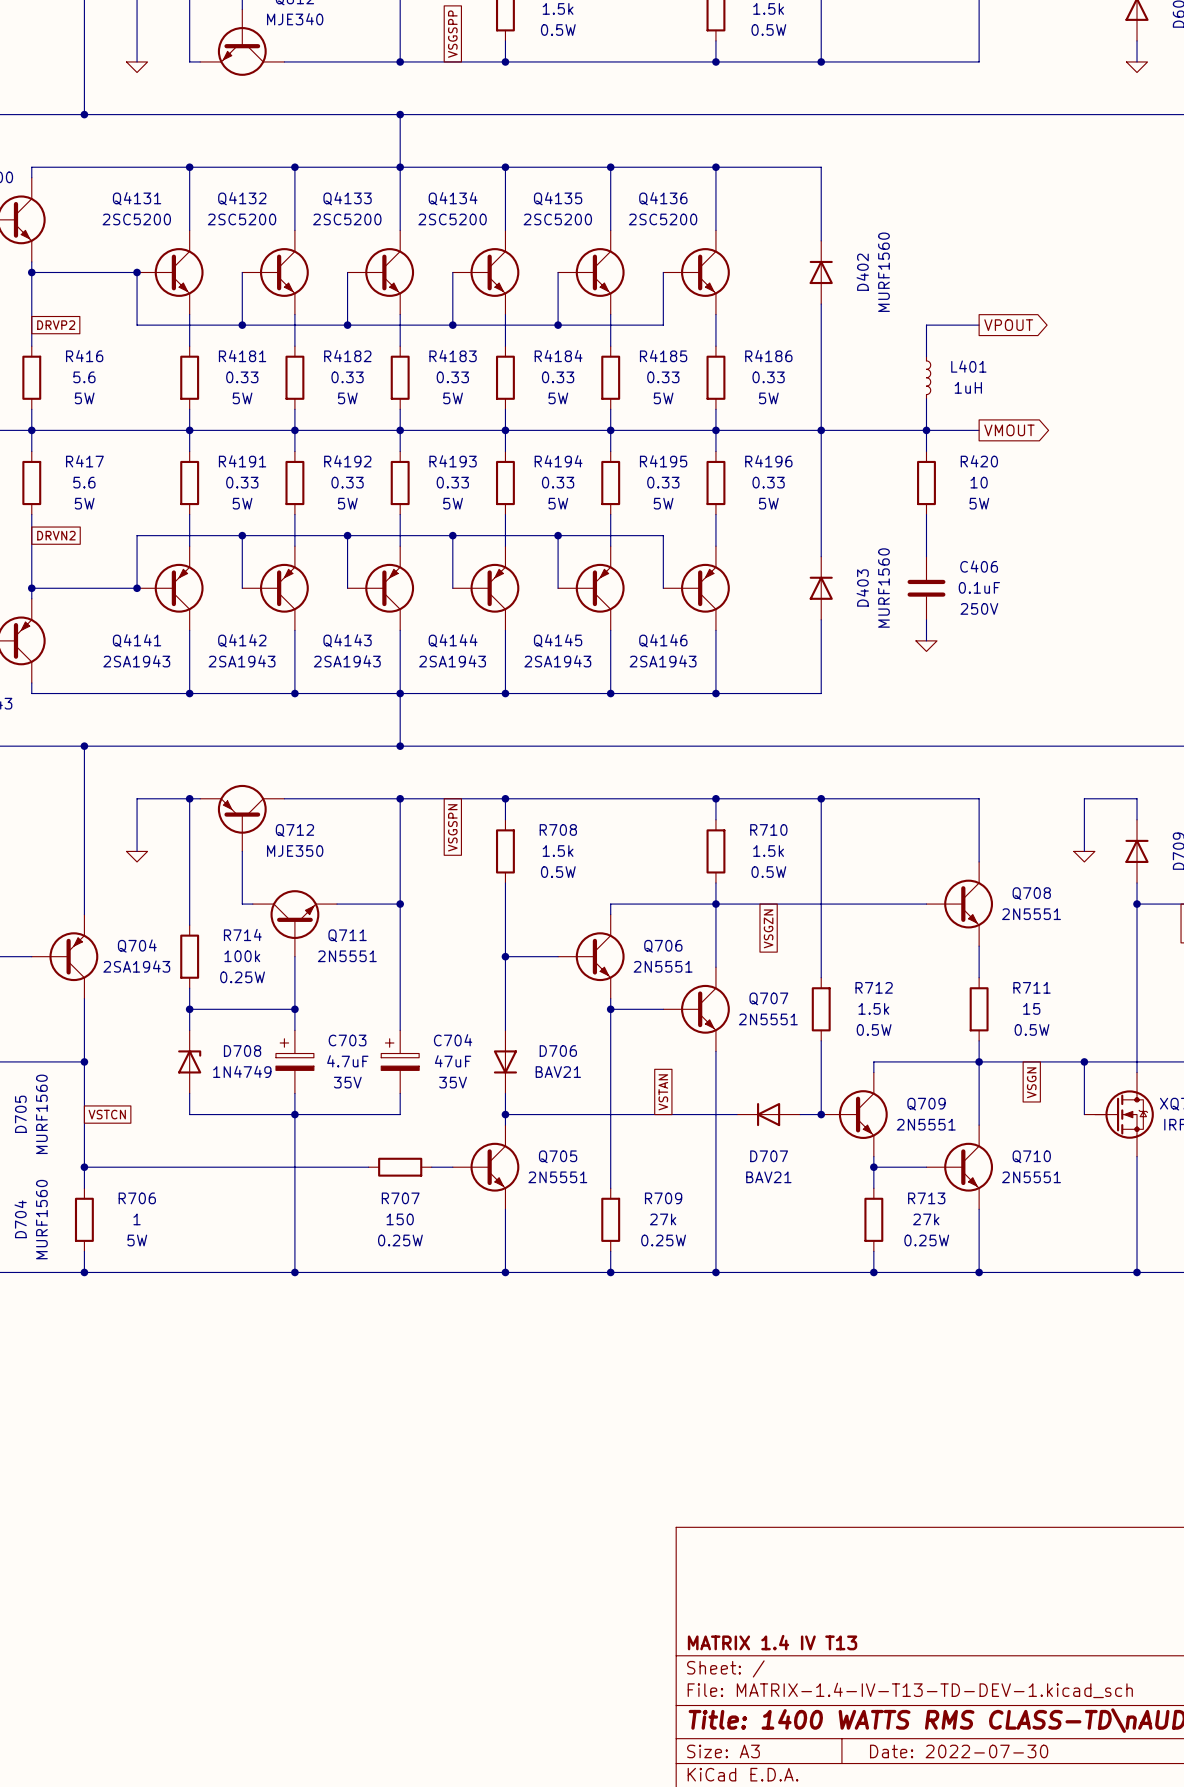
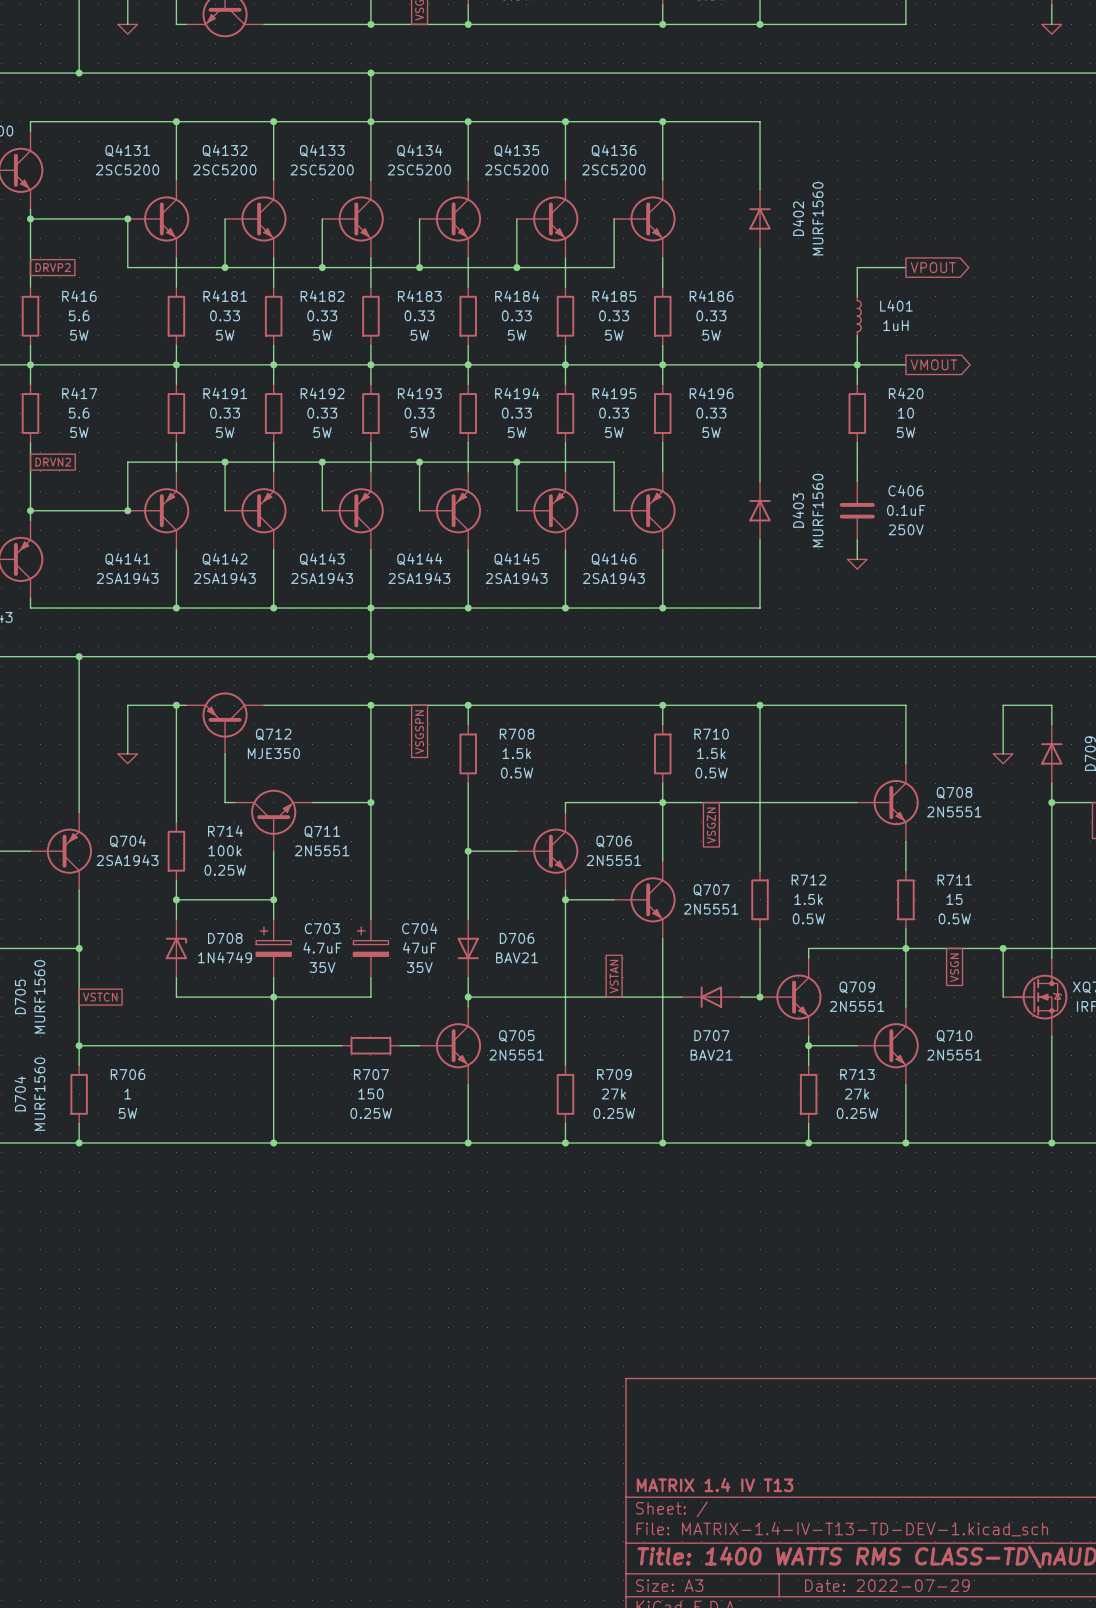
title block: Date: 2022-07-30 (959, 1751) -> Date: 2022-07-29 (887, 1585)

